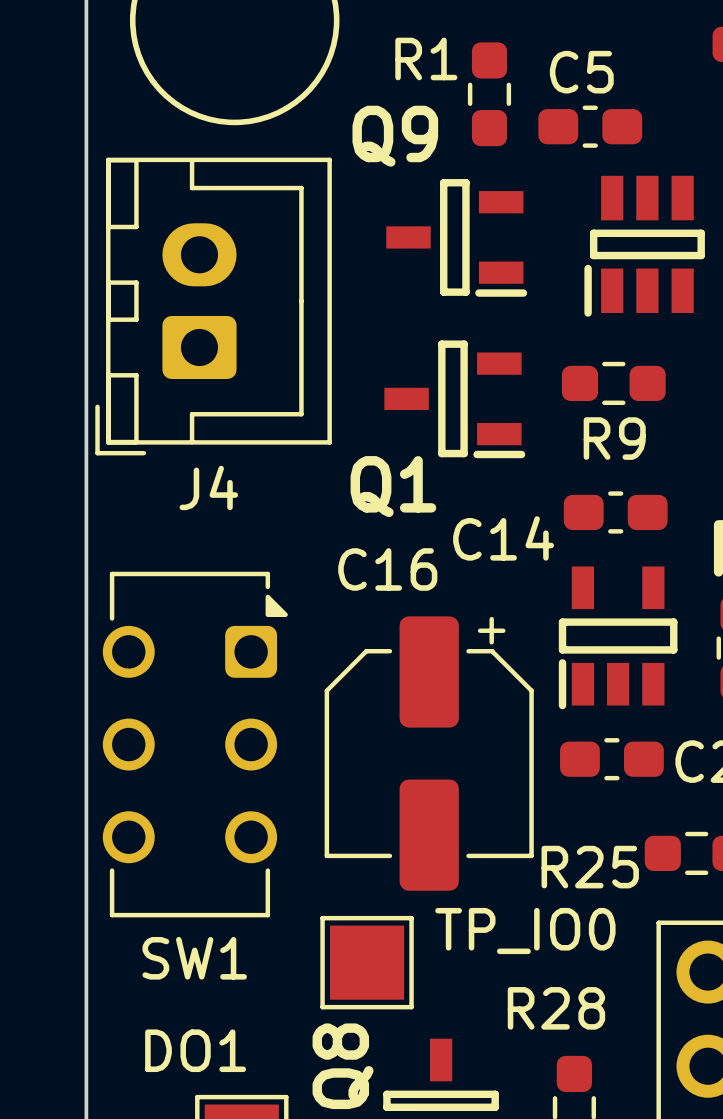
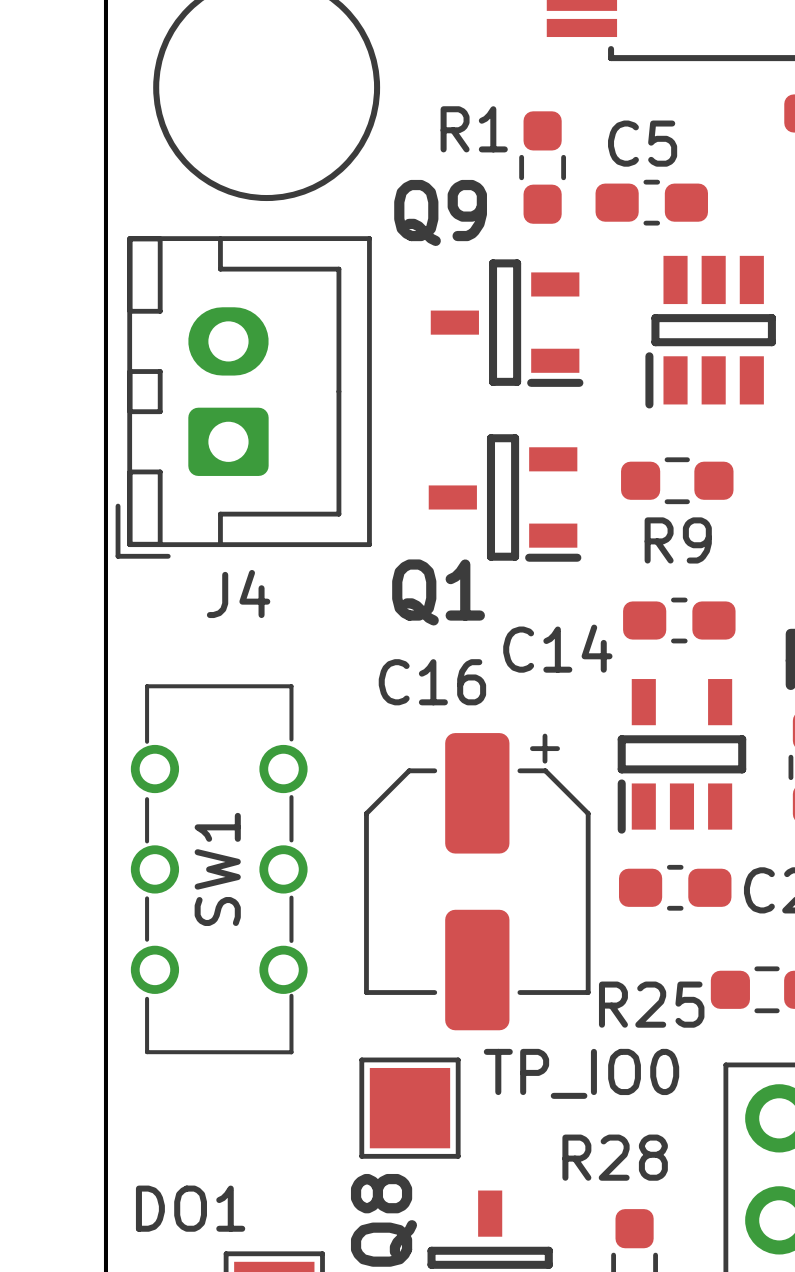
SW1 footprint: [102, 571, 288, 918] -> [130, 684, 308, 1055]
SW1 name position: SW1 (194, 958) -> SW1 (217, 869)
DO1 name position: DO1 (195, 1050) -> DO1 (190, 1208)

